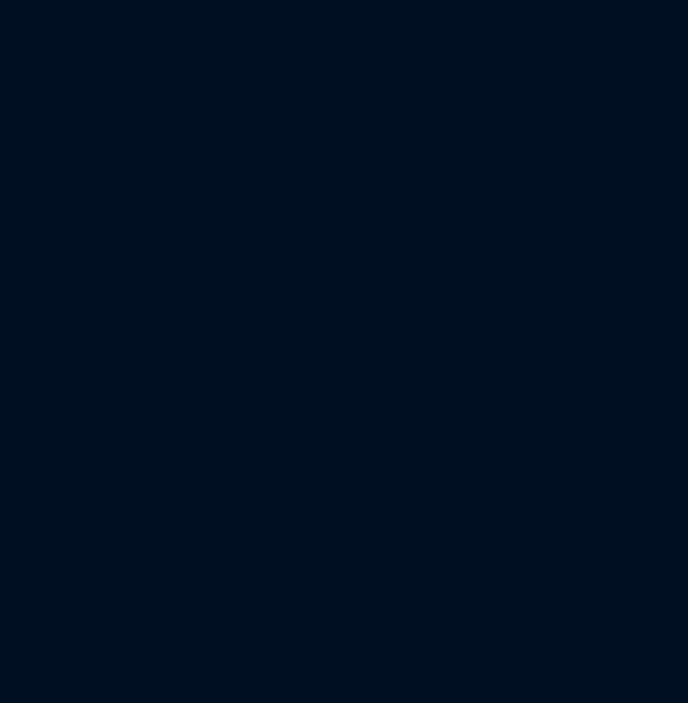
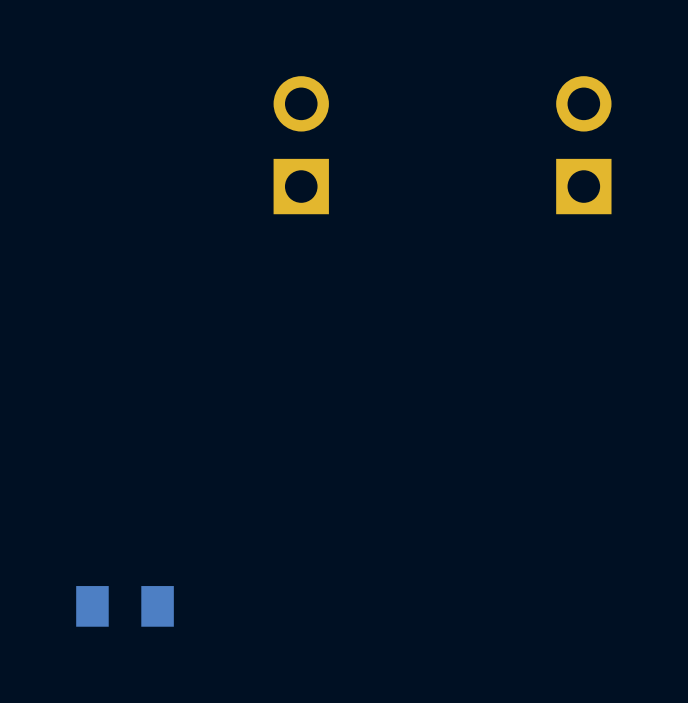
part: none -> (301, 145)
part: none -> (583, 145)
part: none -> (125, 606)

